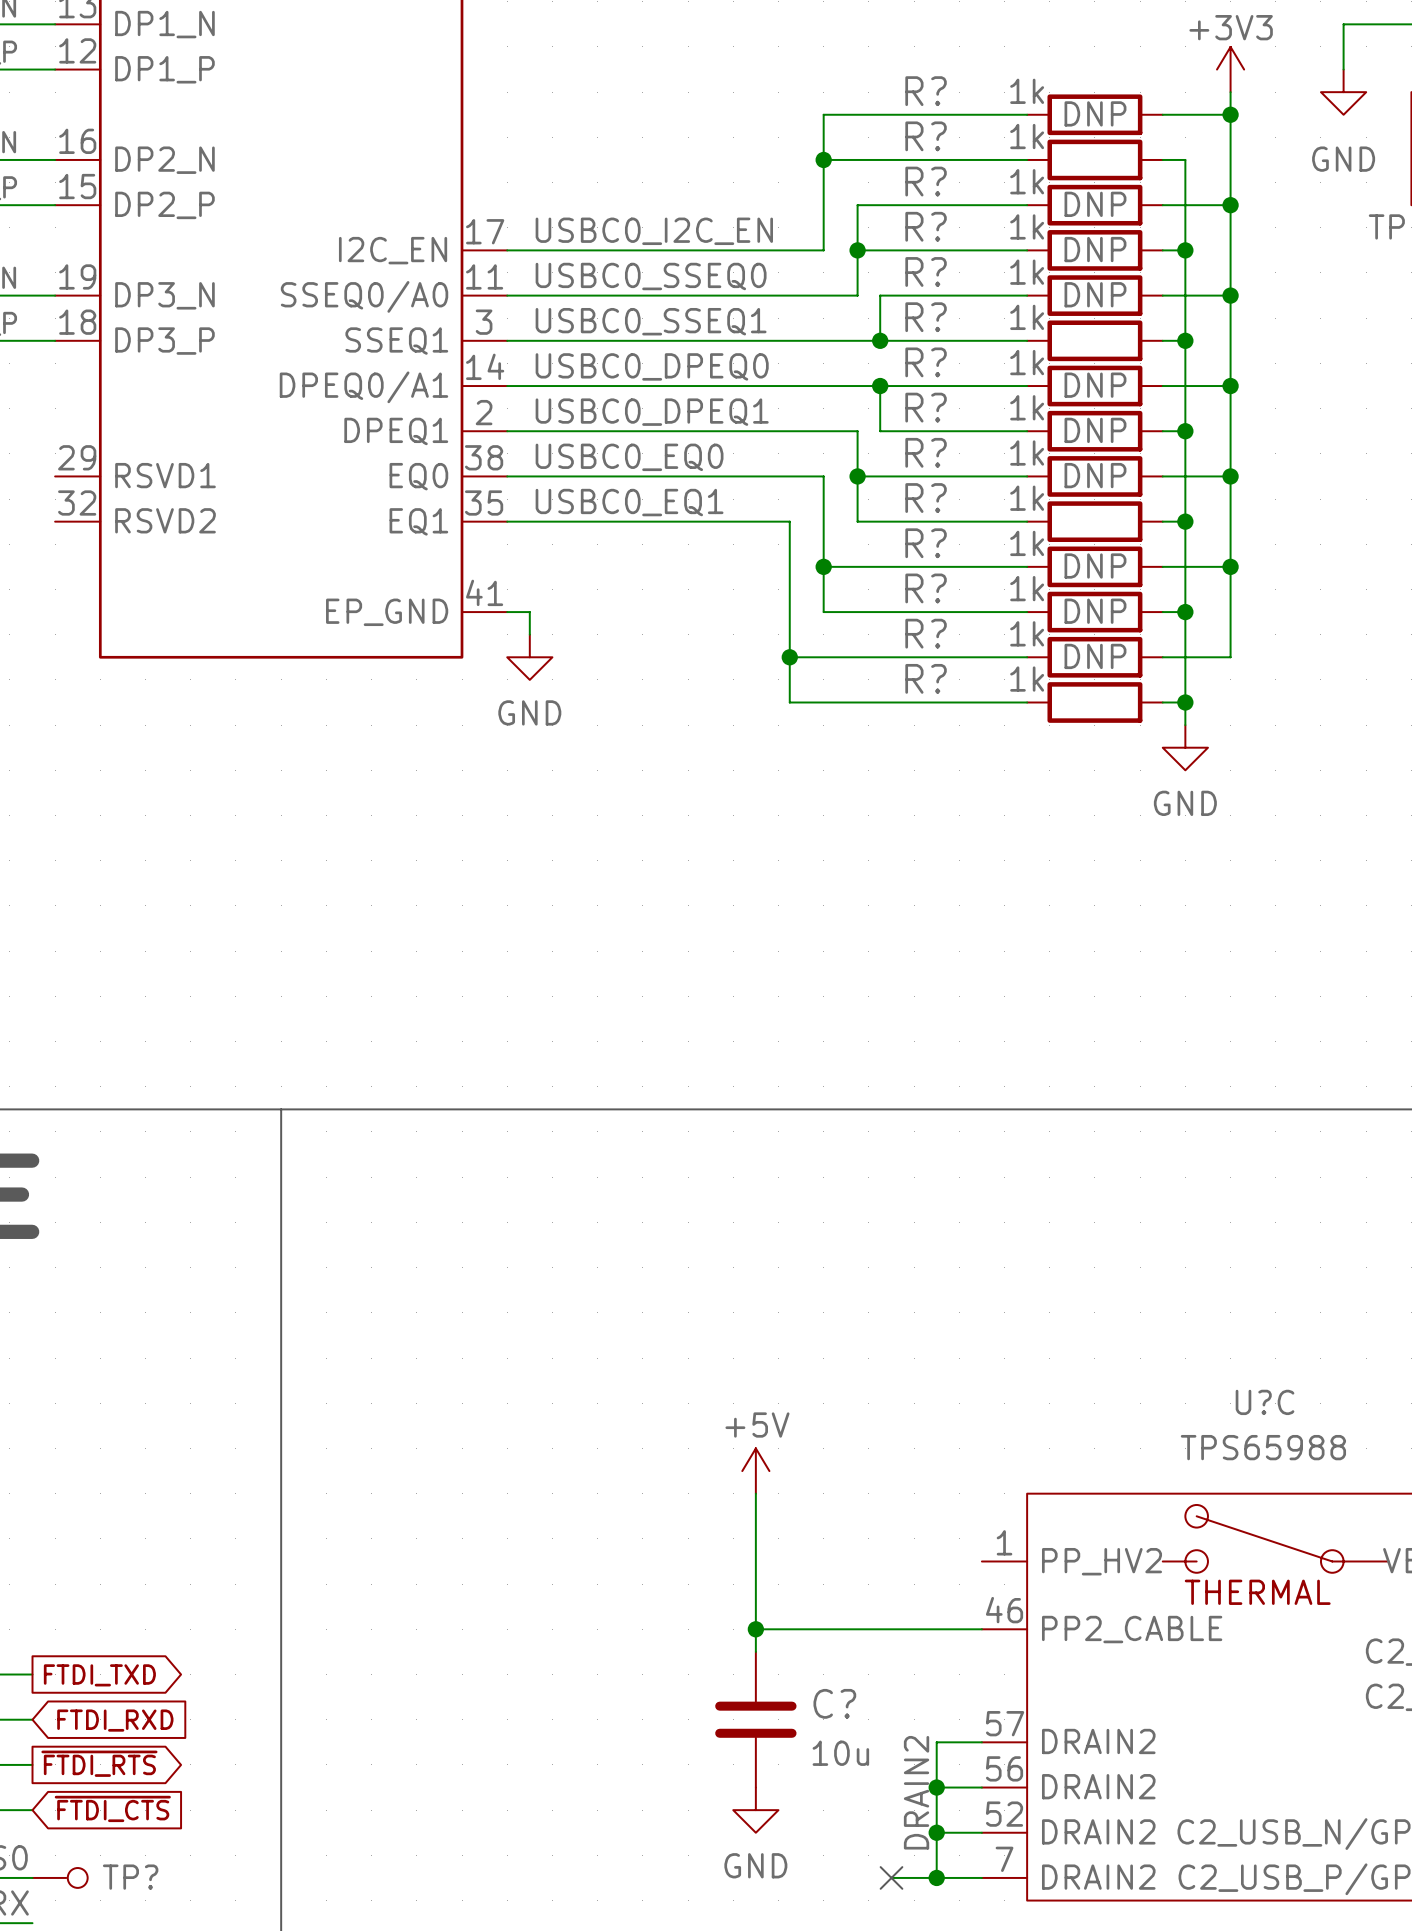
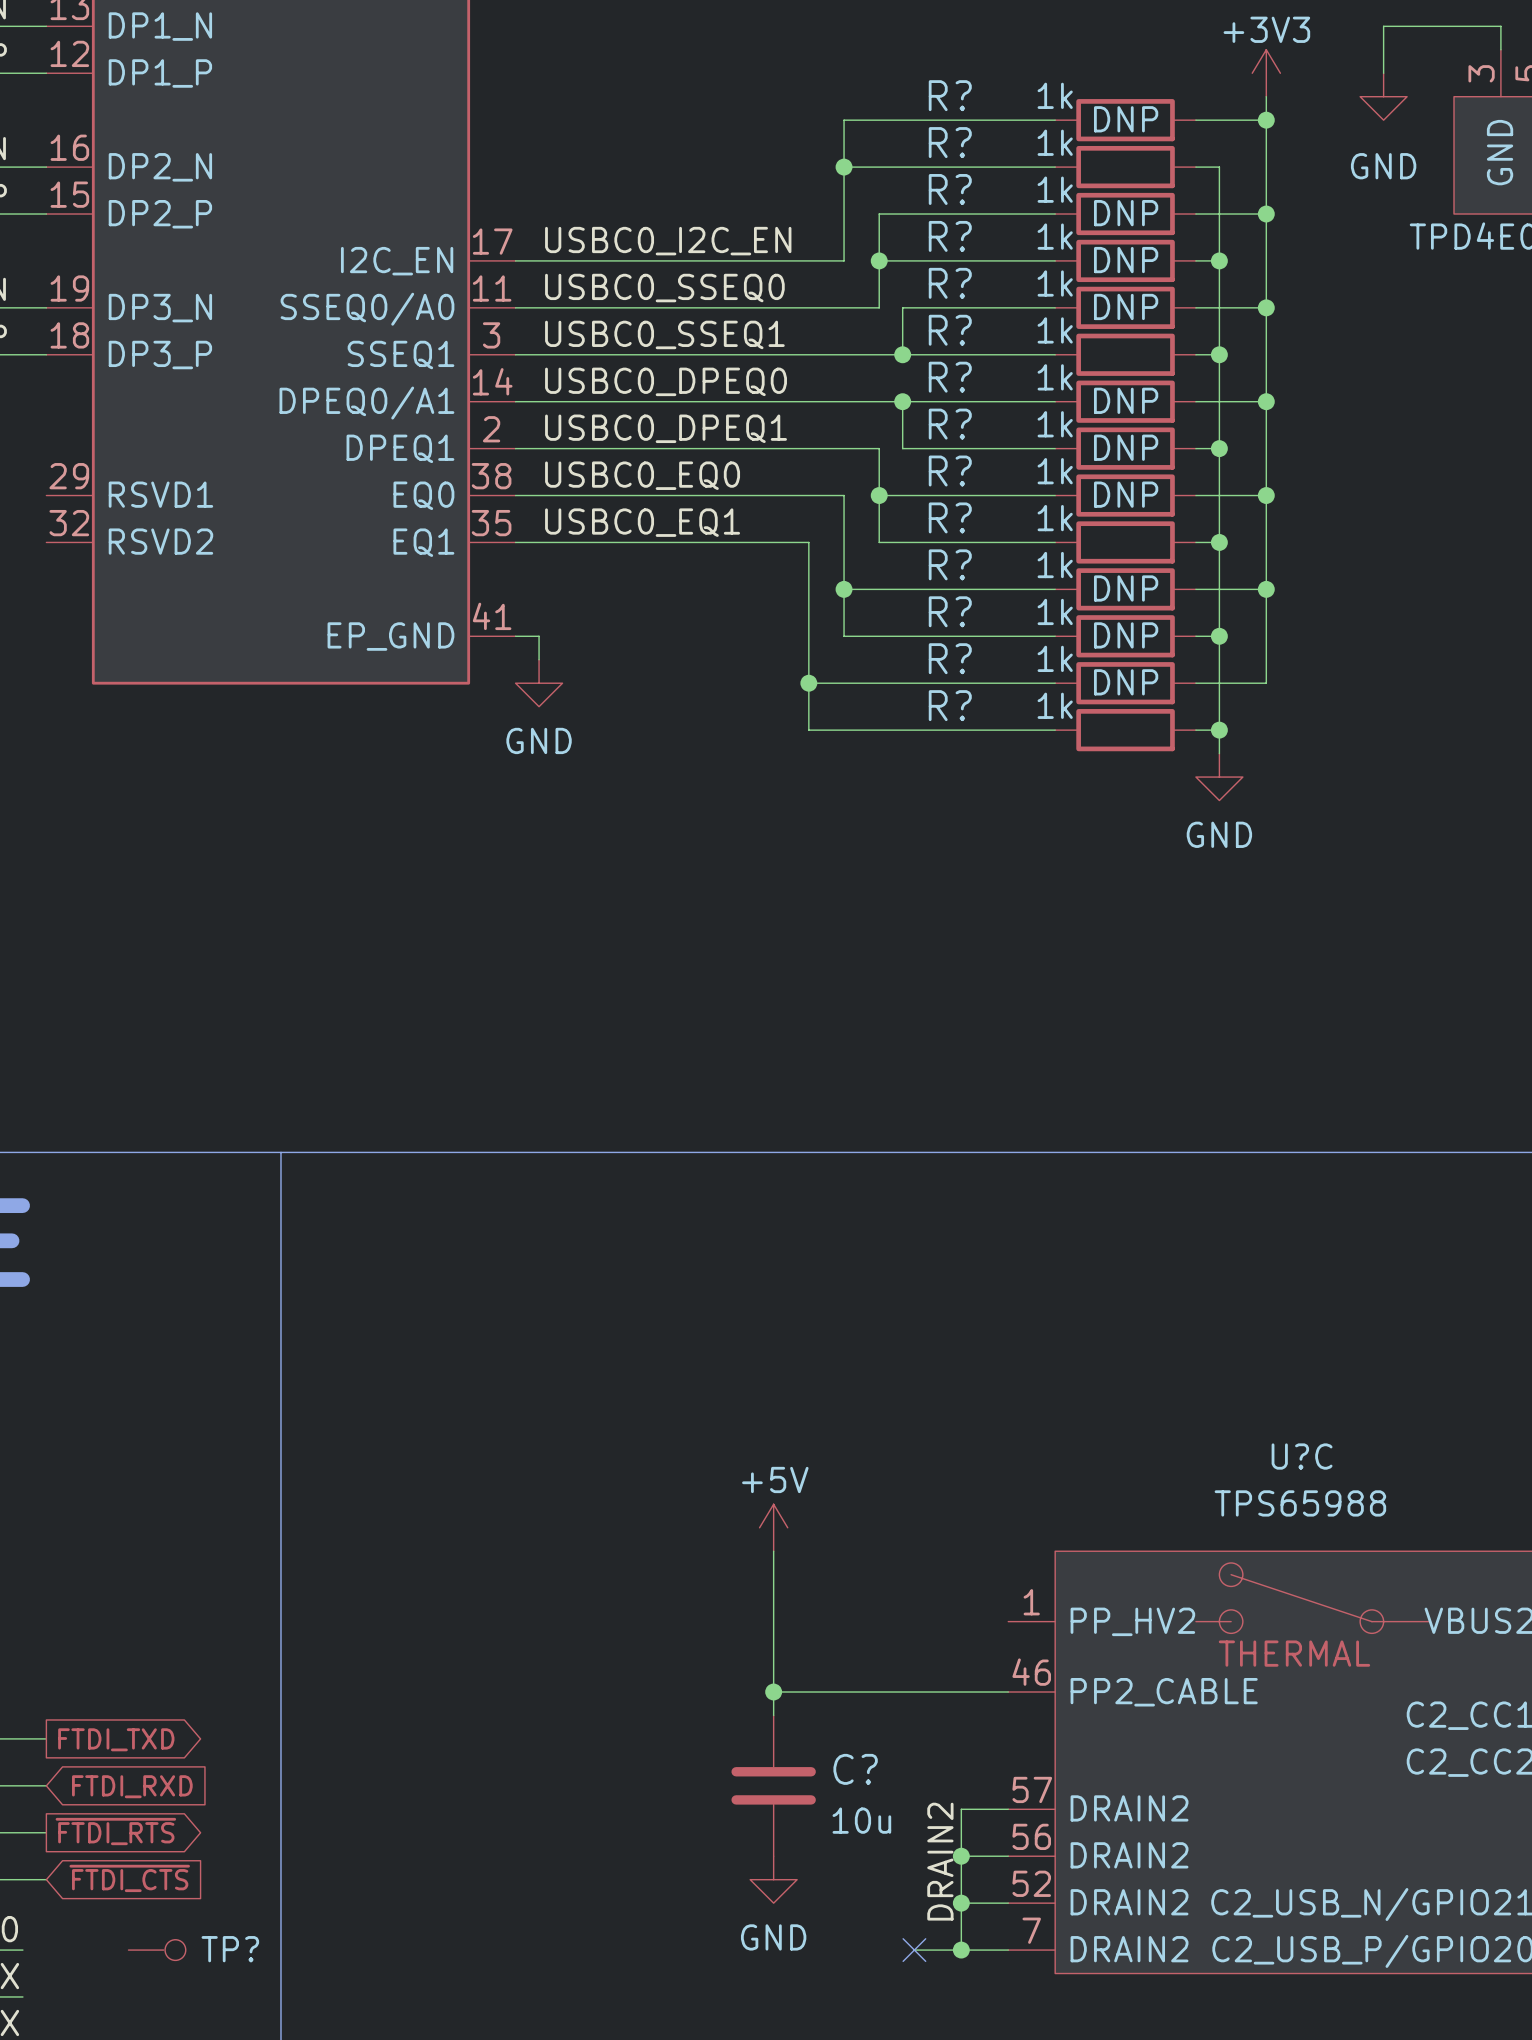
wire: none -> (22, 1738) (46, 1738)
global label position: FTDI_TXD (99, 1675) -> FTDI_TXD (116, 1739)
wire: none -> (22, 1785) (46, 1785)
global label position: FTDI_RXD (115, 1720) -> FTDI_RXD (132, 1786)
global label position: ~{FTDI_RTS} (99, 1763) -> ~{FTDI_RTS} (115, 1831)
wire: none -> (22, 1832) (46, 1832)
global label position: ~{FTDI_CTS} (112, 1808) -> ~{FTDI_CTS} (129, 1878)
wire: none -> (22, 1879) (46, 1879)
TP?: (60, 1877) -> none
TP?: none -> (157, 1950)

